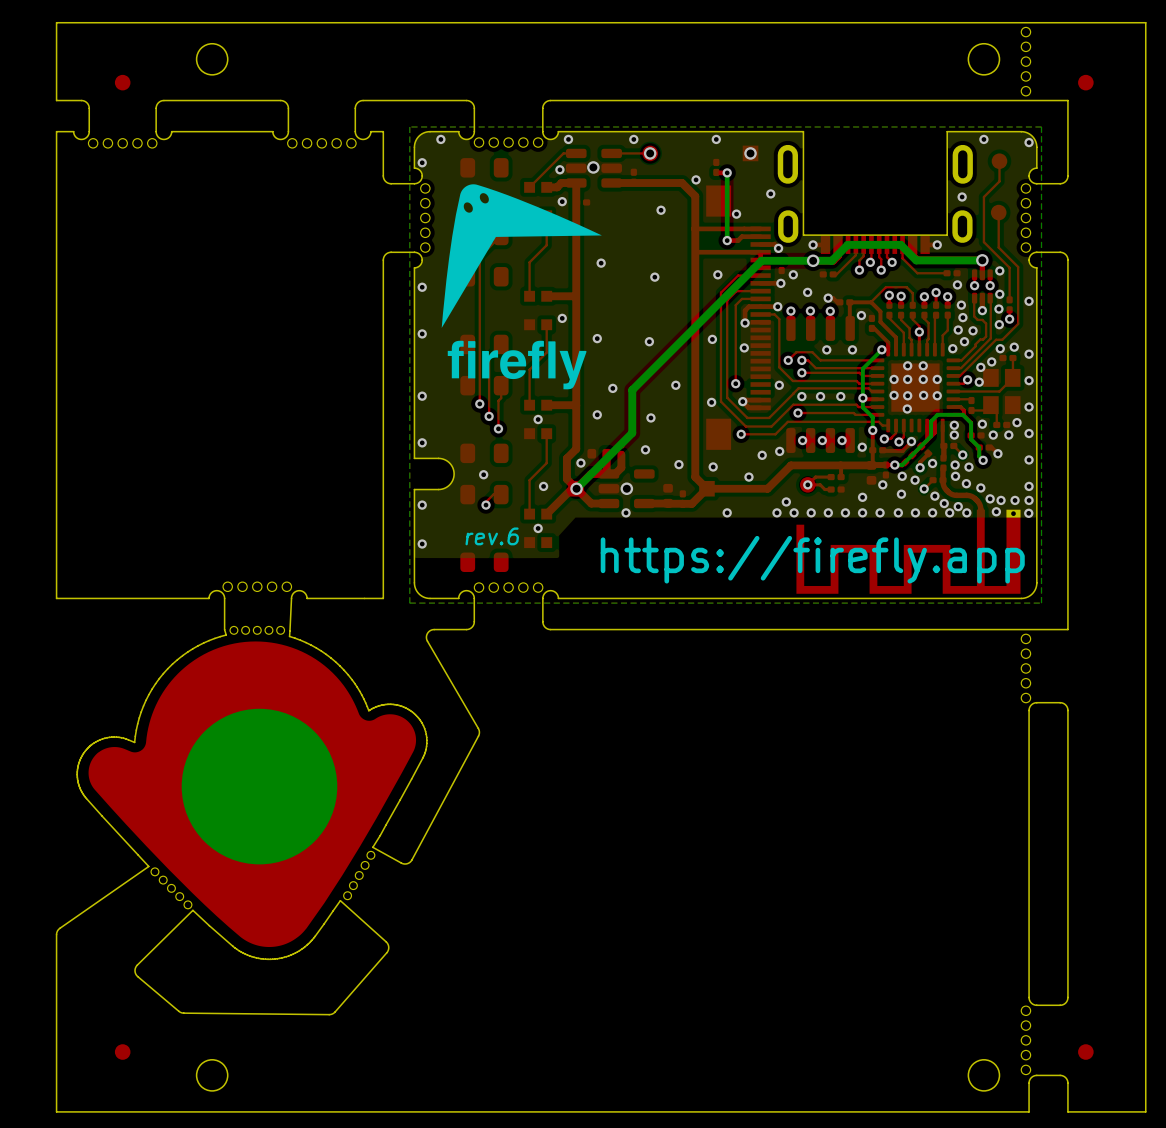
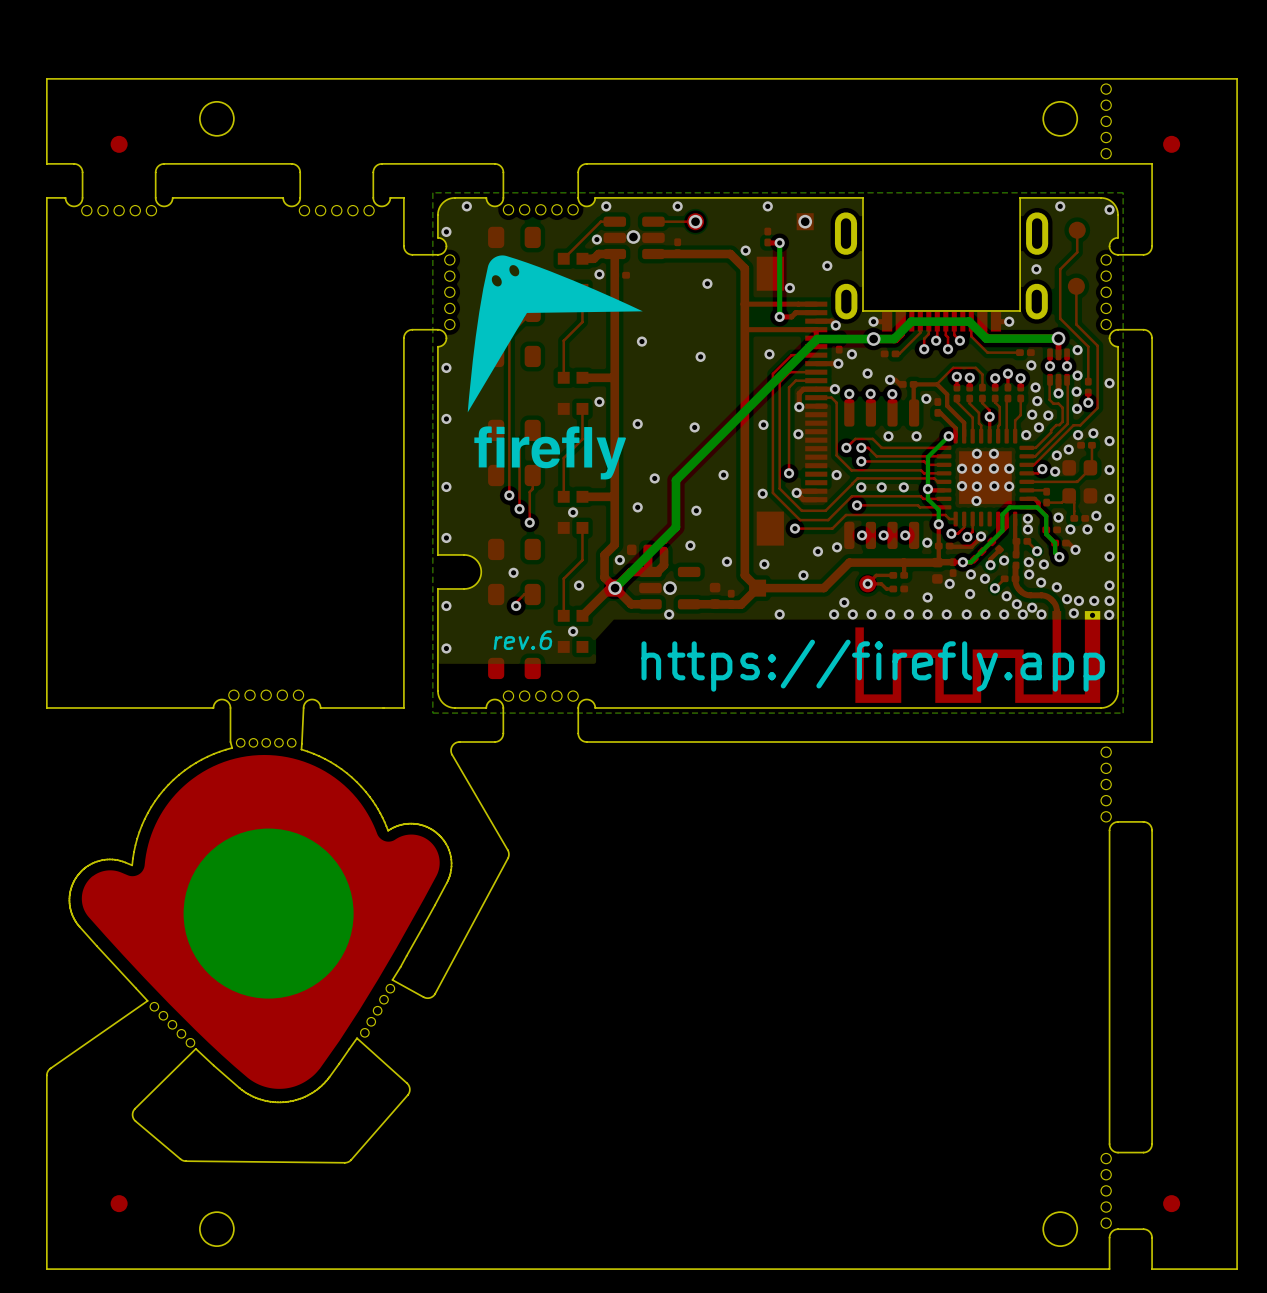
part footprint: [983, 368, 1021, 415] -> [1062, 460, 1098, 504]

